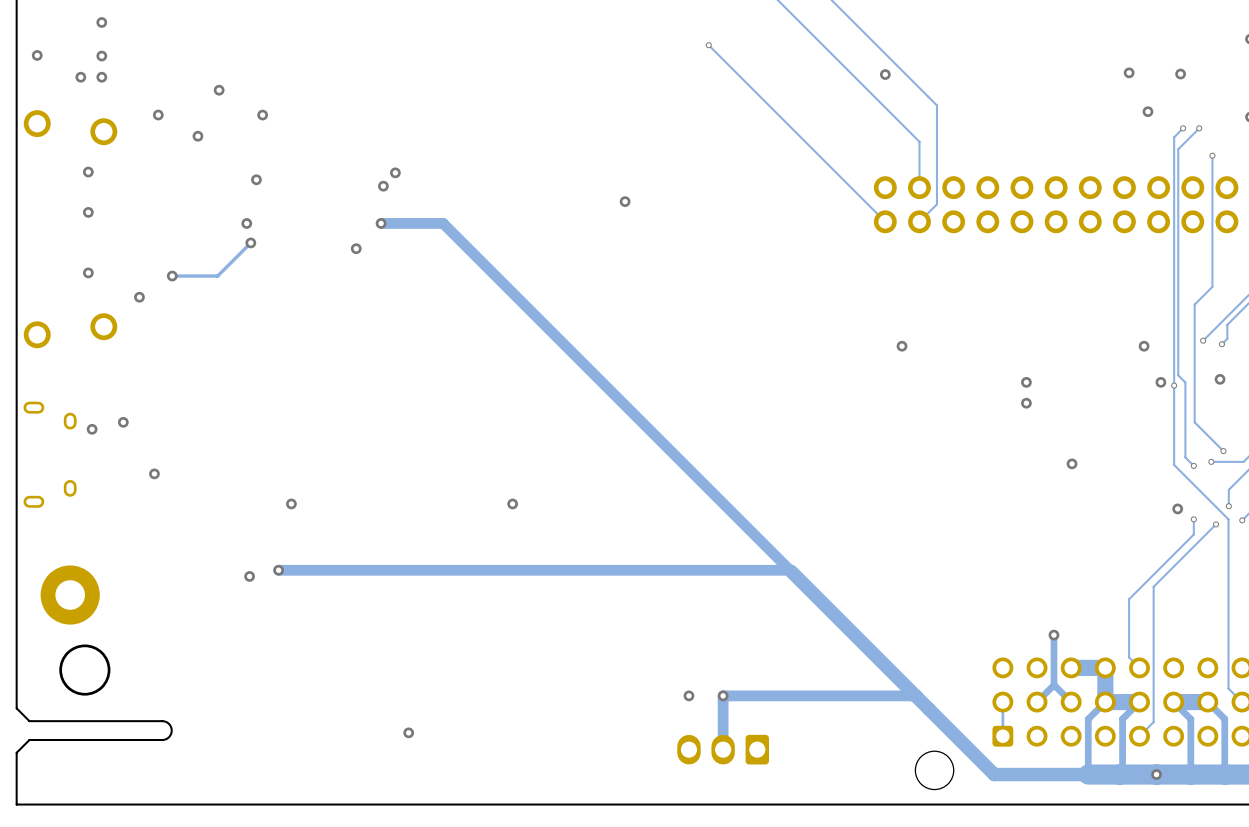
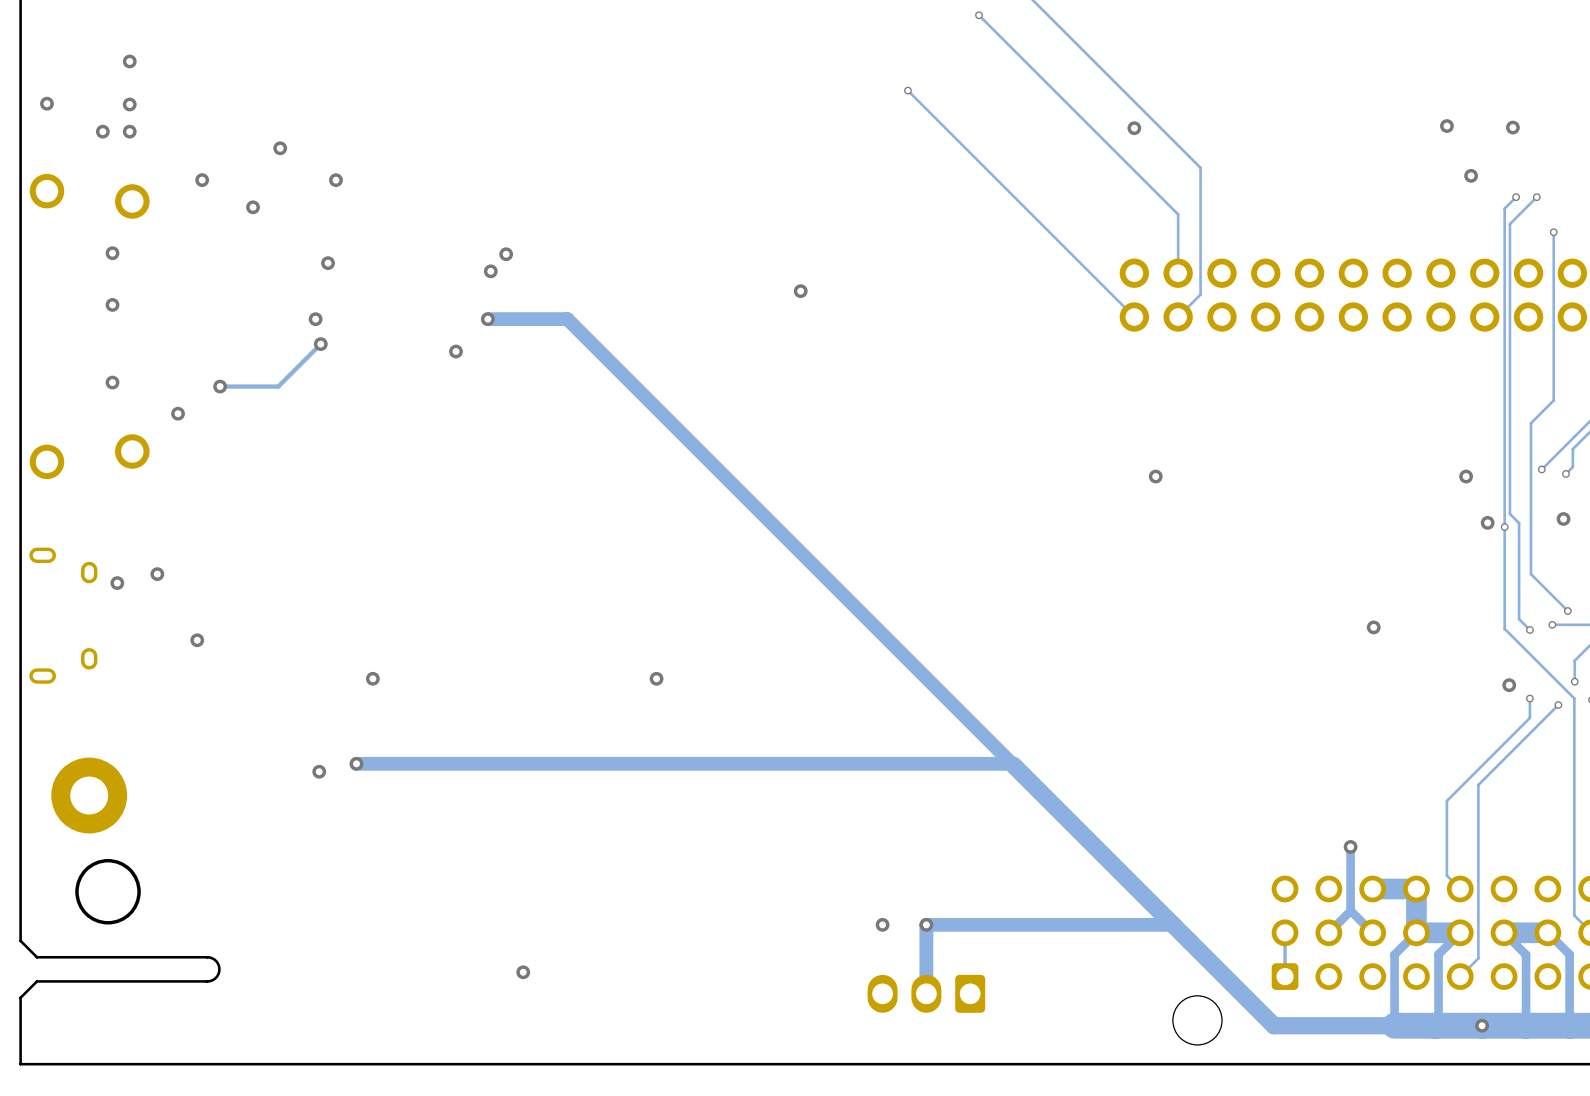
via: (1026, 382) -> none
via: (1026, 403) -> none

